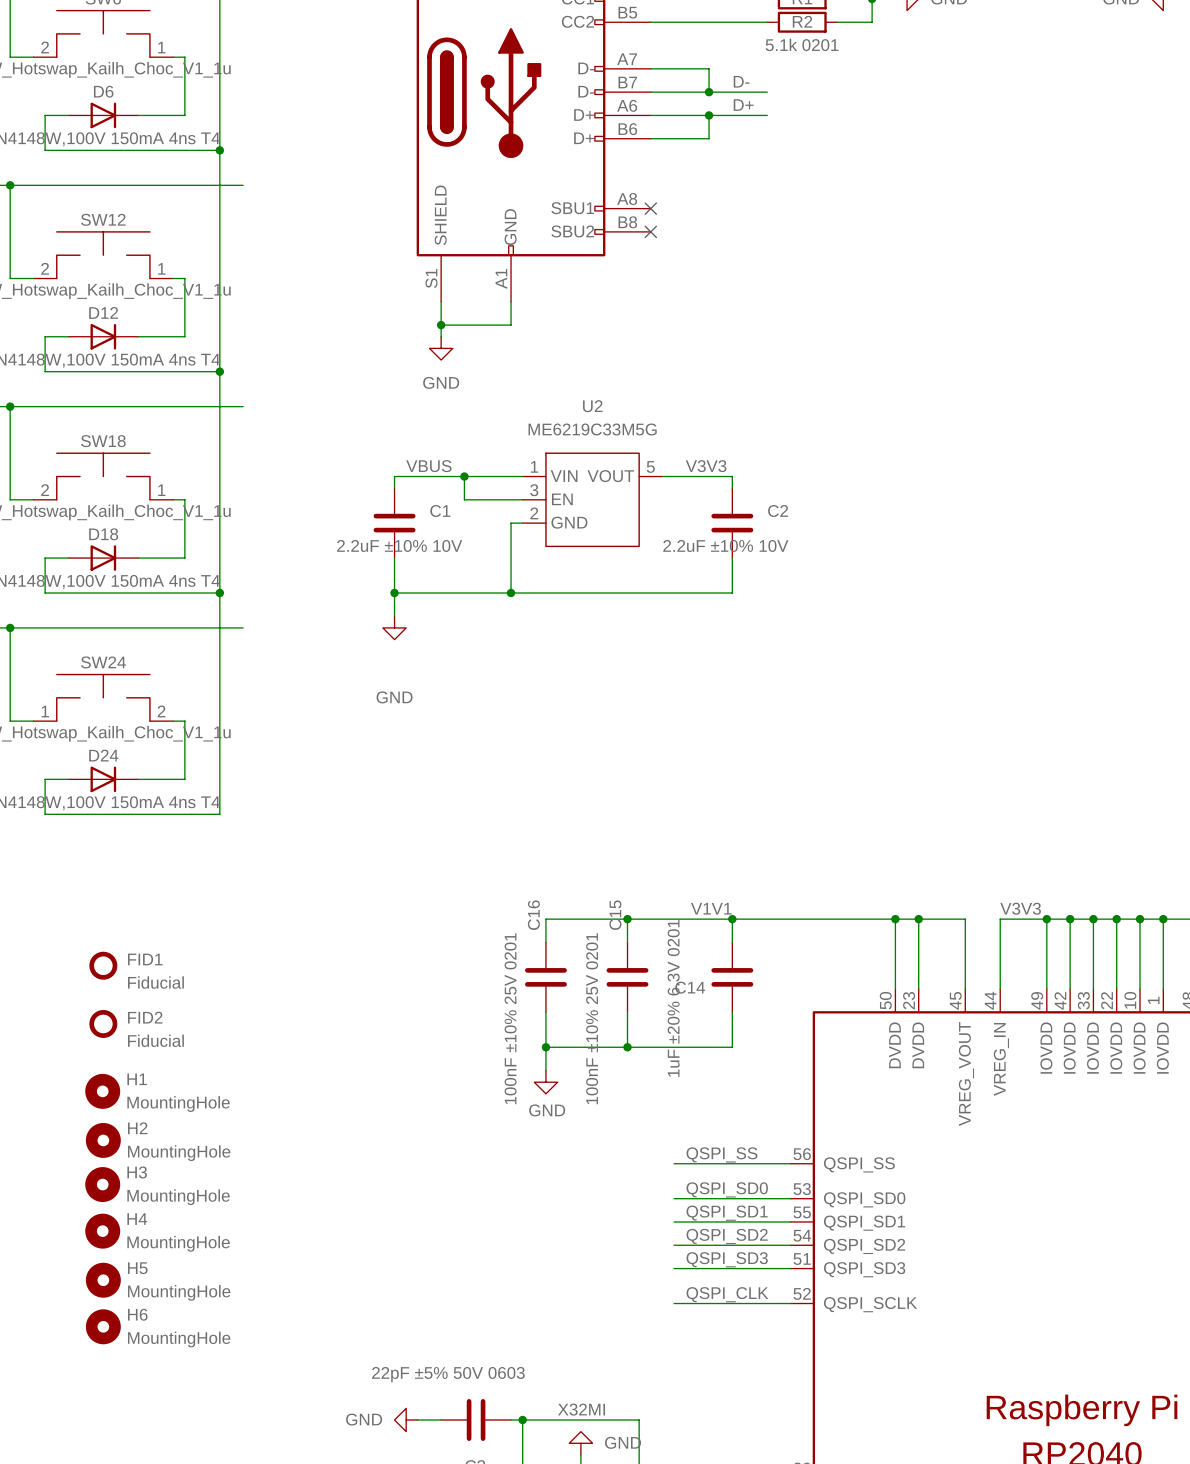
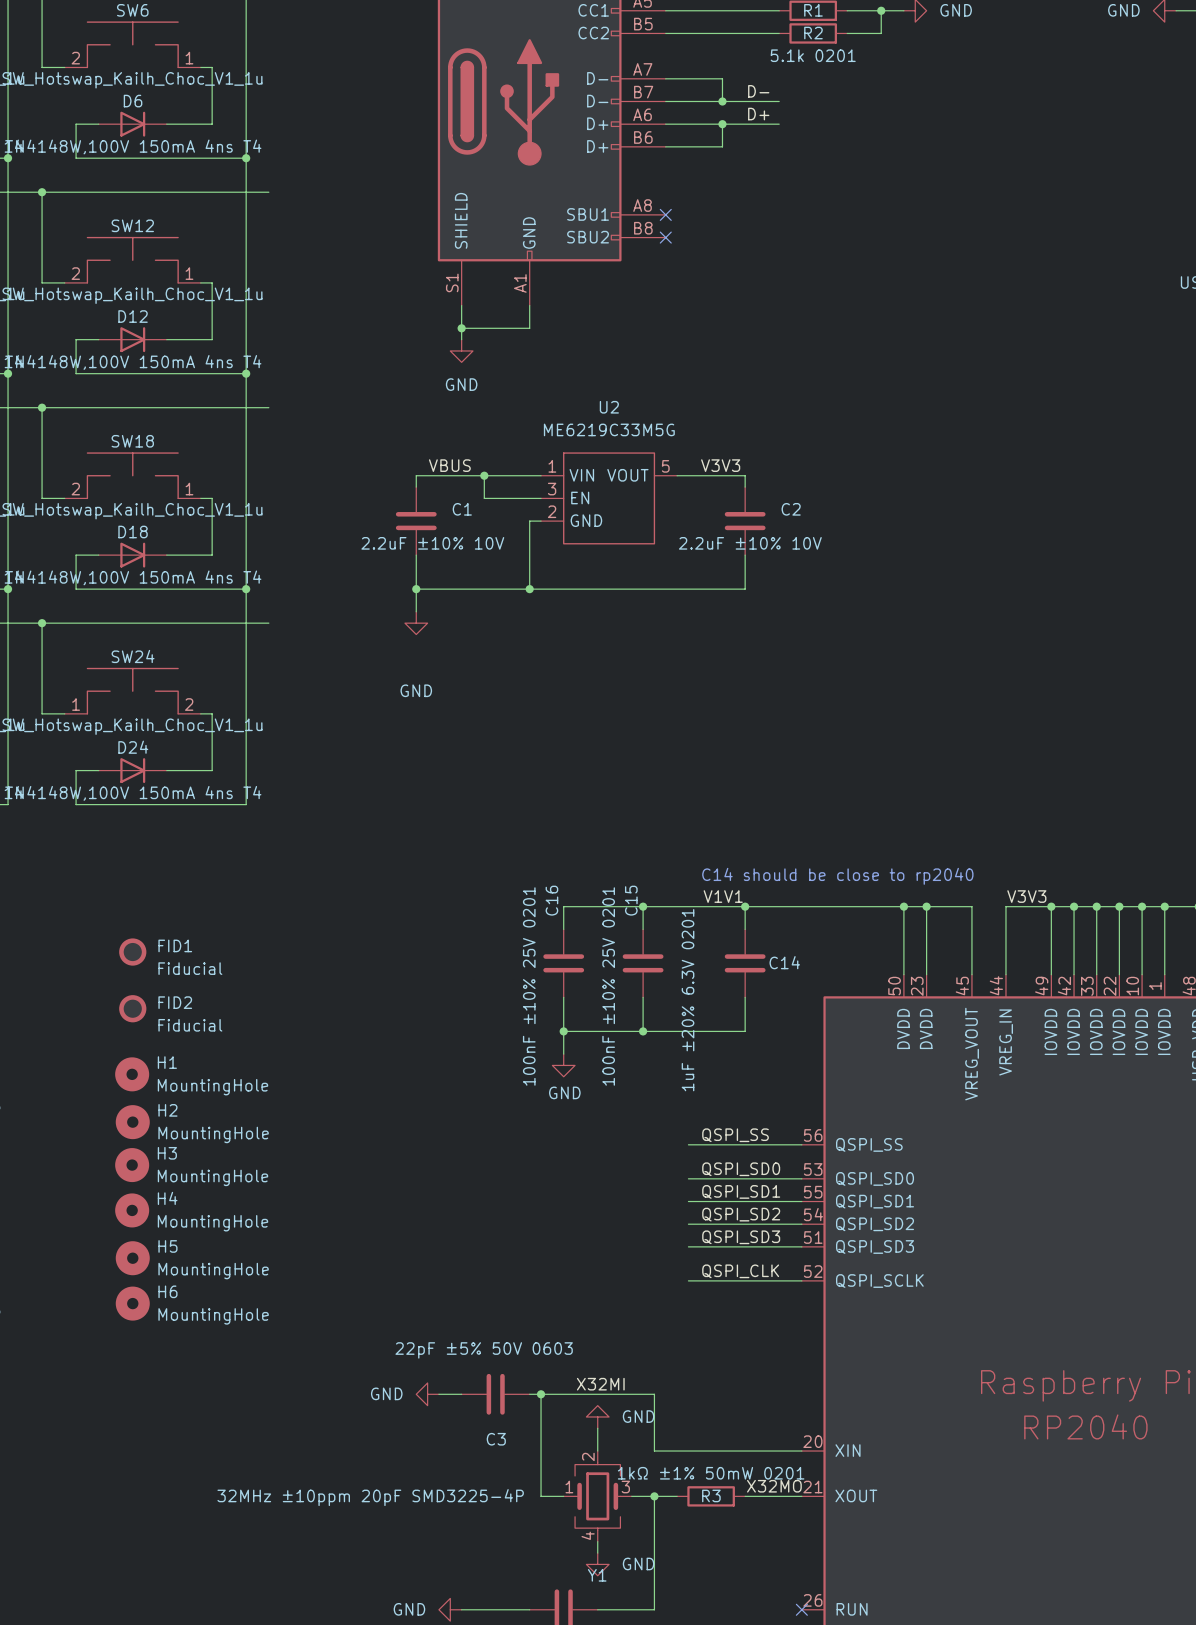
text: none -> C14 should be close to rp2040 (837, 876)
C14 name position: C14 (690, 987) -> C14 (784, 962)

